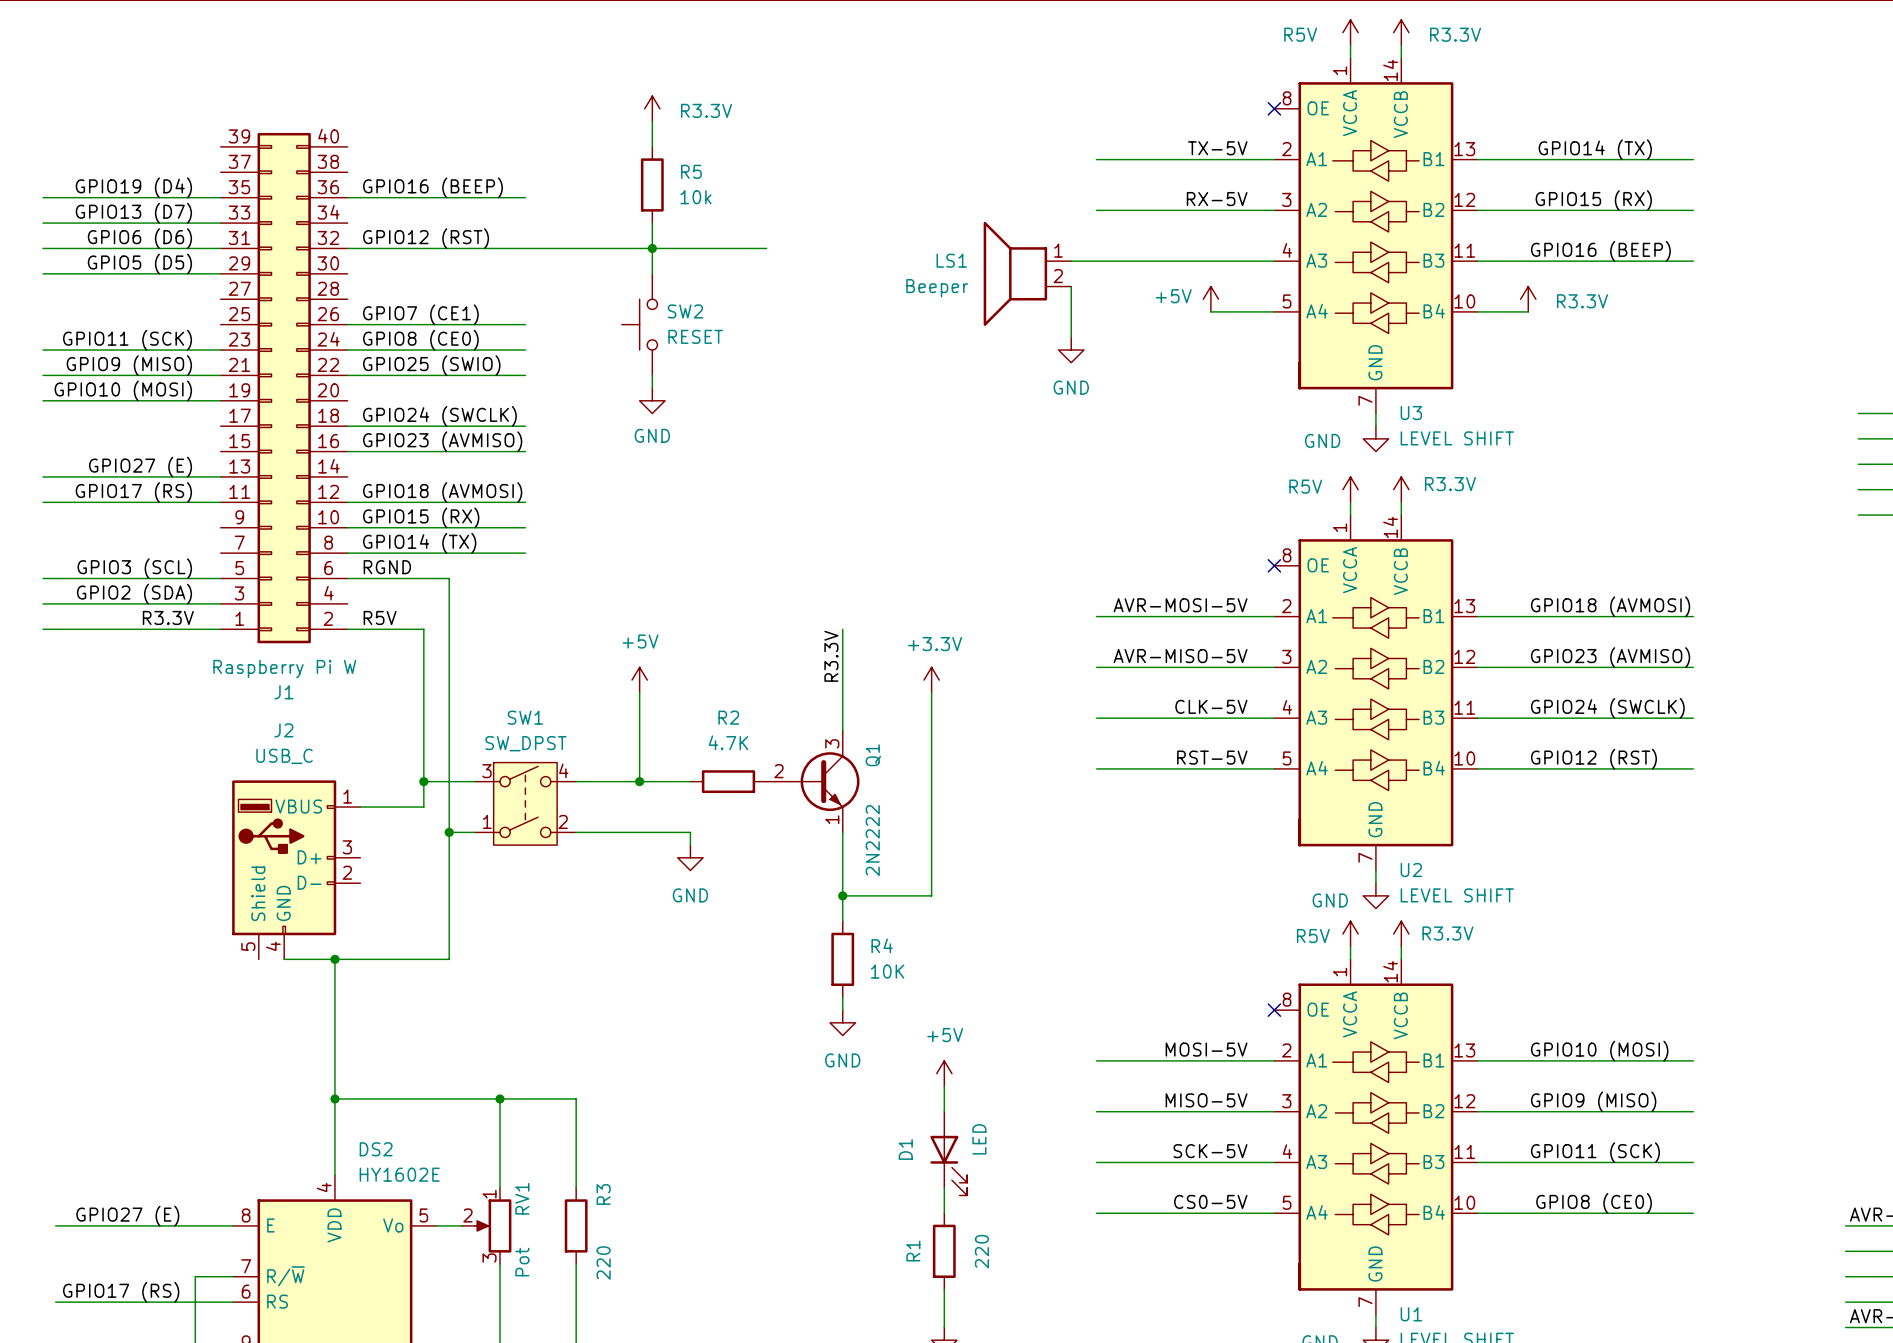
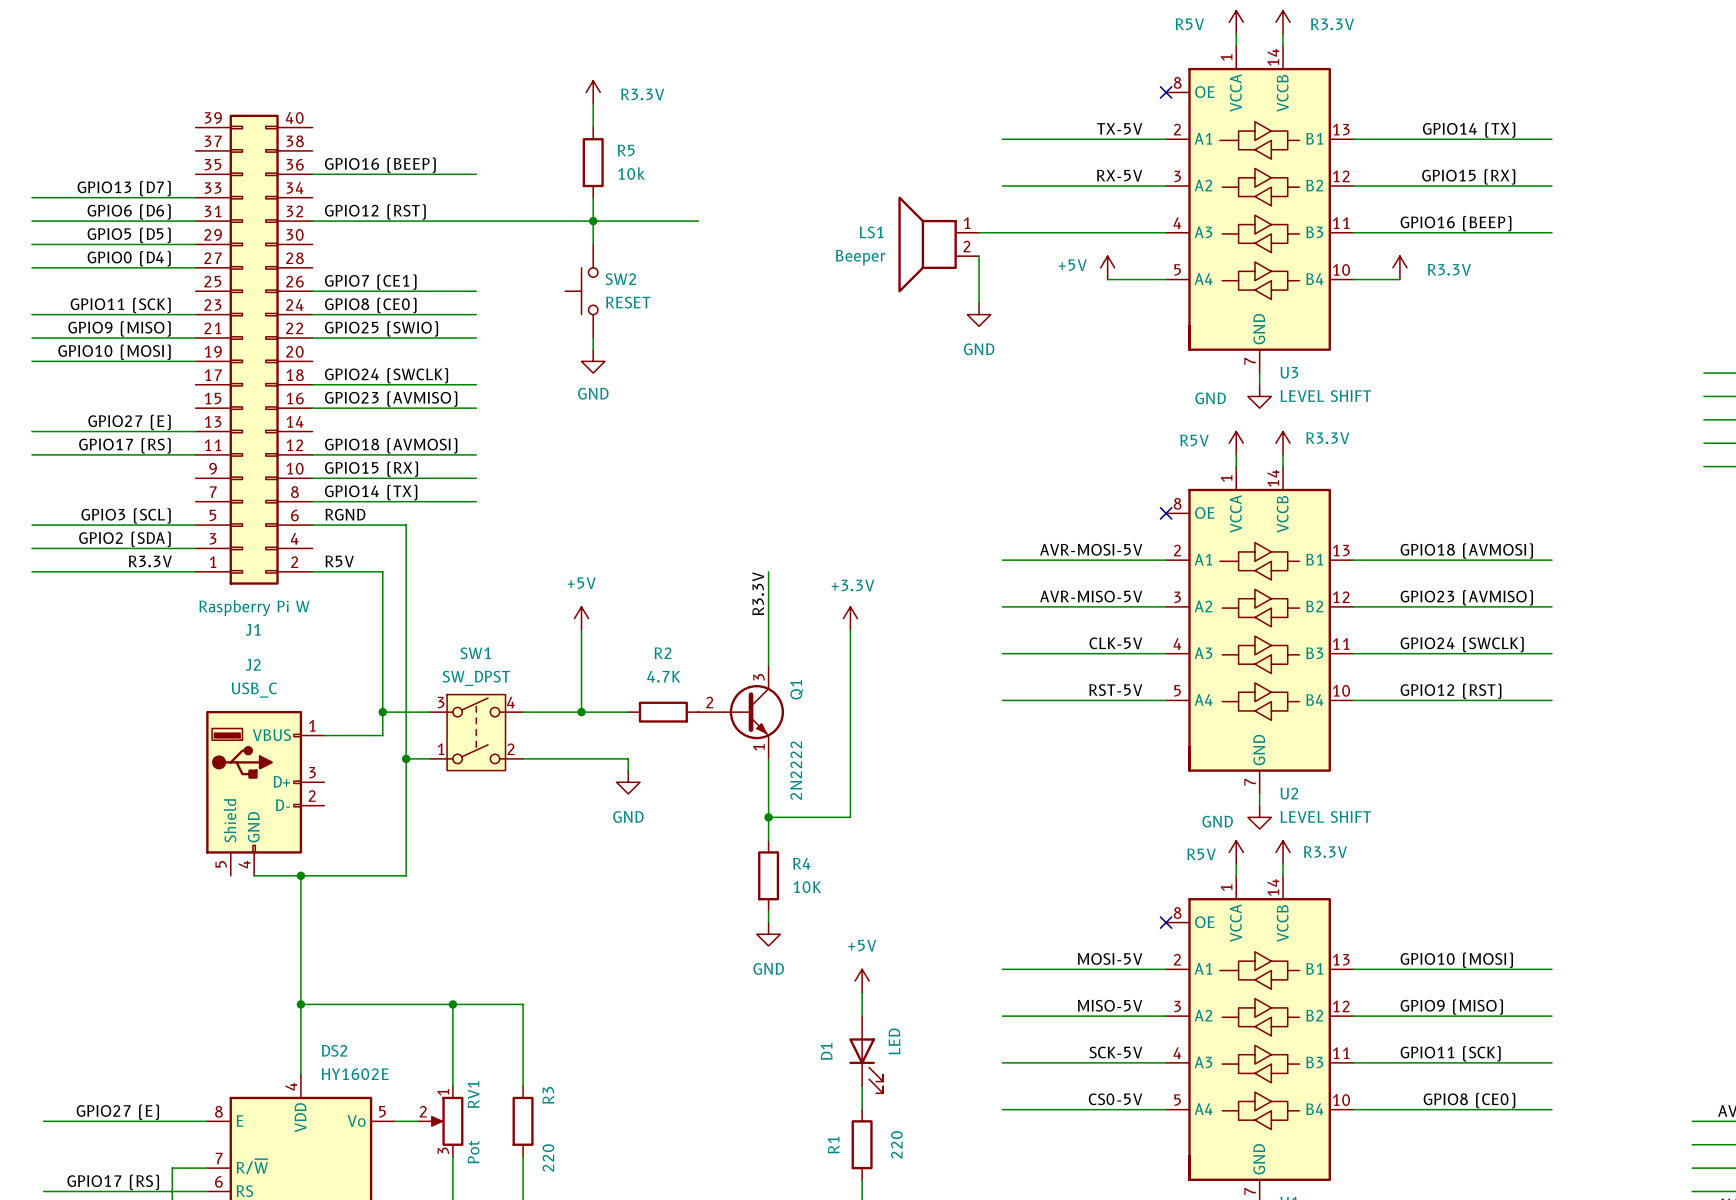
label: GPIO19 (D4) (133, 187) -> none
wire: (42, 197) (220, 197) -> (32, 267) (195, 267)
label: none -> GPIO0 (D4) (129, 258)

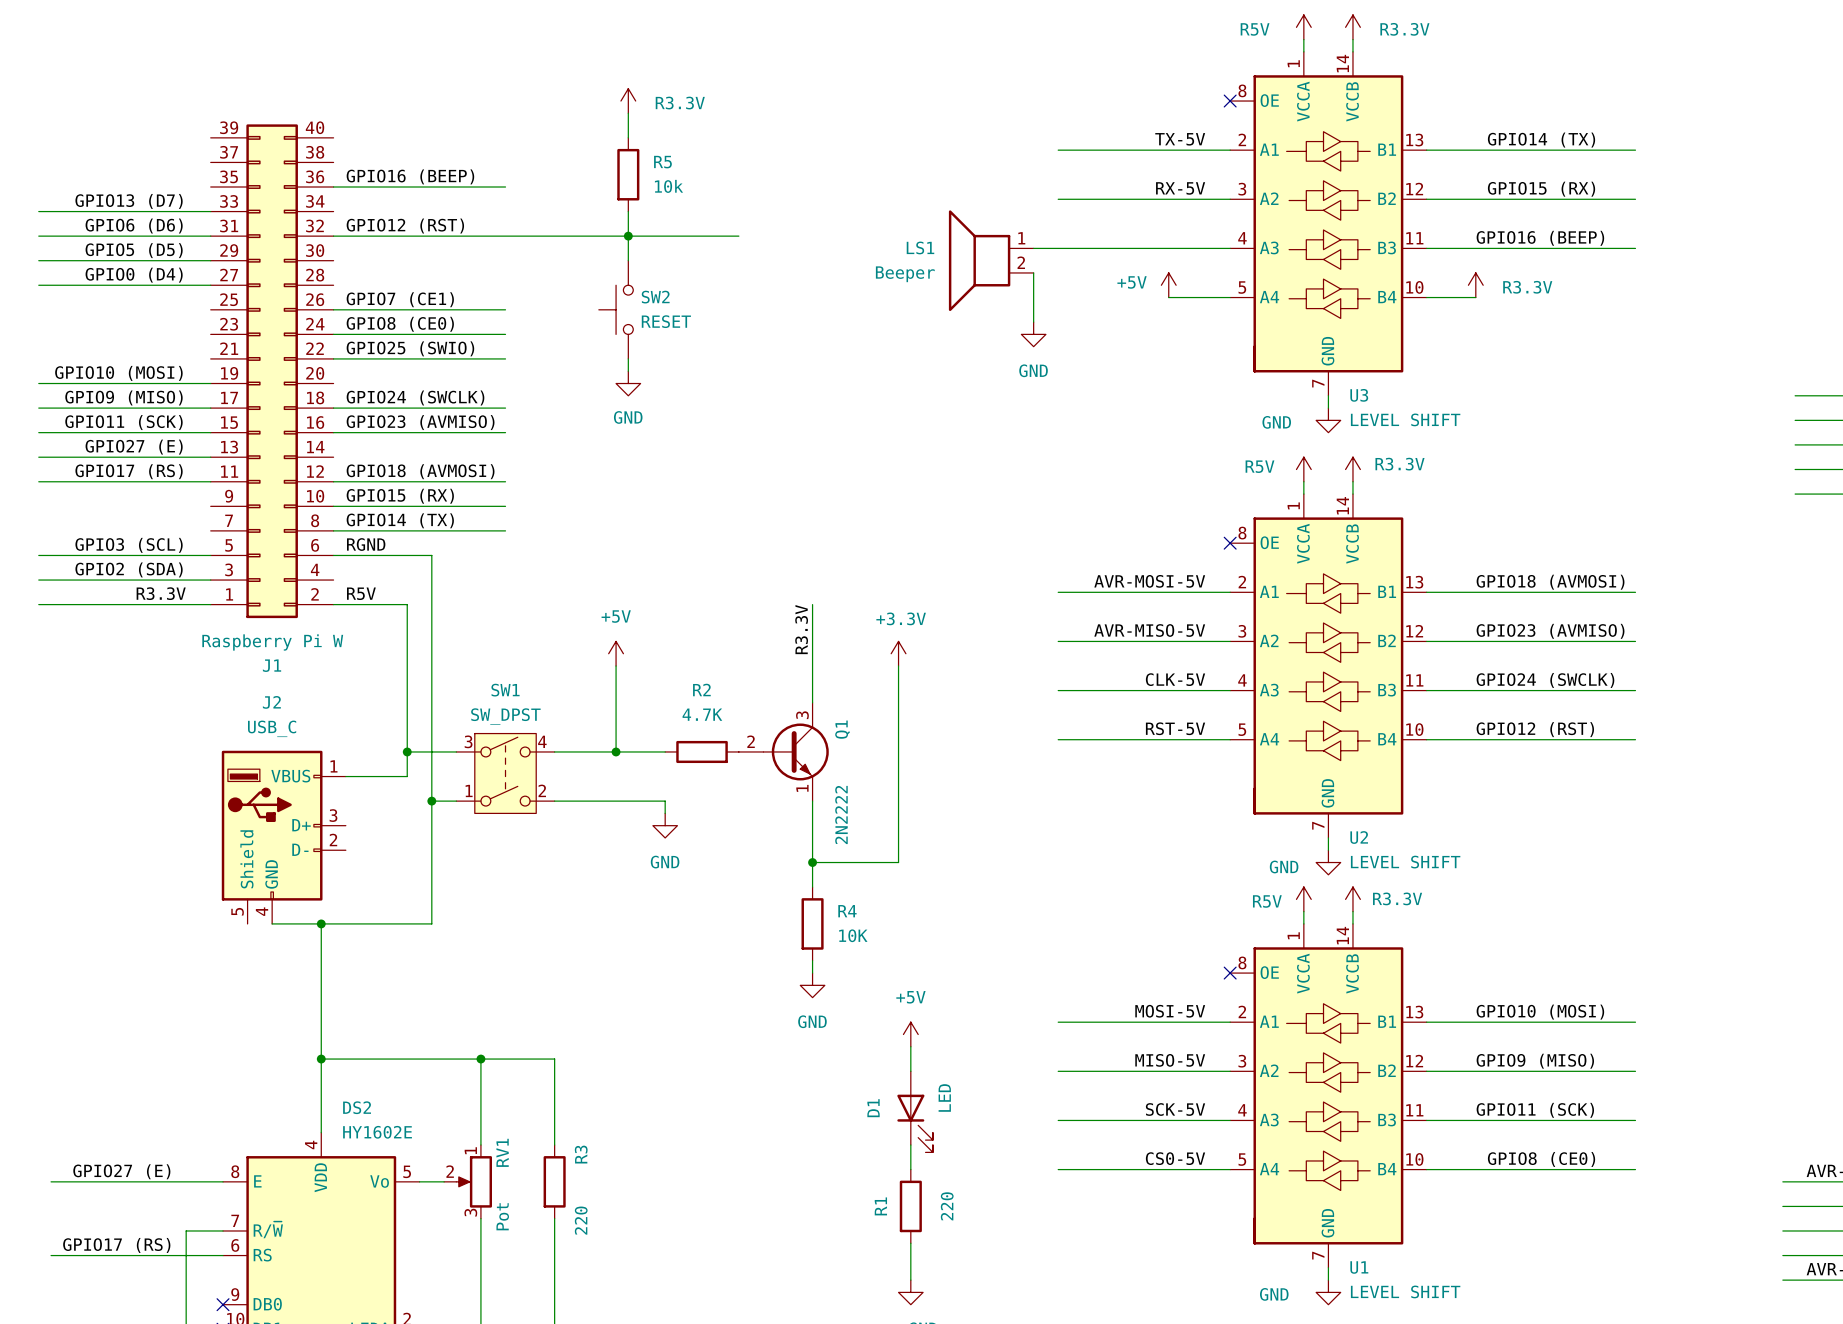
label position: GPIO11 (SCK) (120, 305) -> GPIO11 (SCK) (123, 422)
wire: (32, 314) (195, 314) -> (38, 432) (210, 432)
label position: GPIO9 (MISO) (119, 328) -> GPIO9 (MISO) (123, 397)
wire: (32, 338) (195, 338) -> (38, 408) (210, 408)

